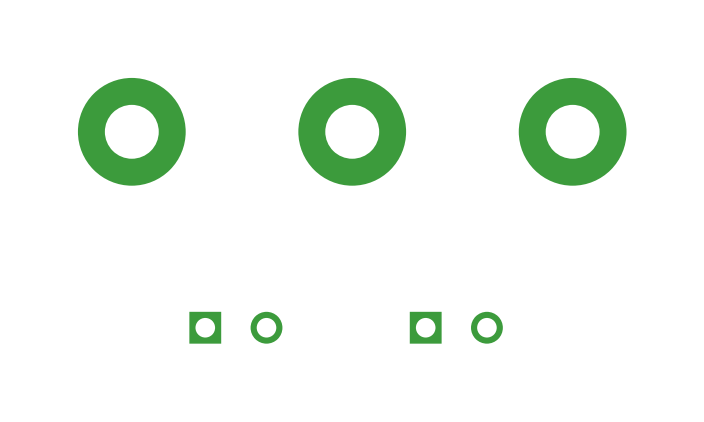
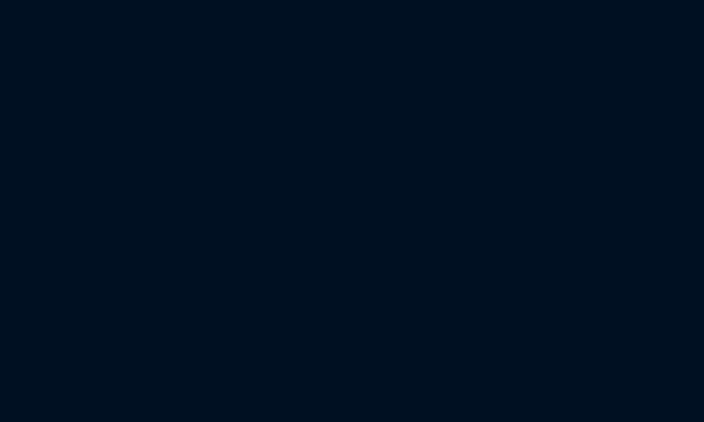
part: (131, 131) -> none
part: (352, 131) -> none
part: (572, 131) -> none
part: (235, 327) -> none
part: (456, 327) -> none

